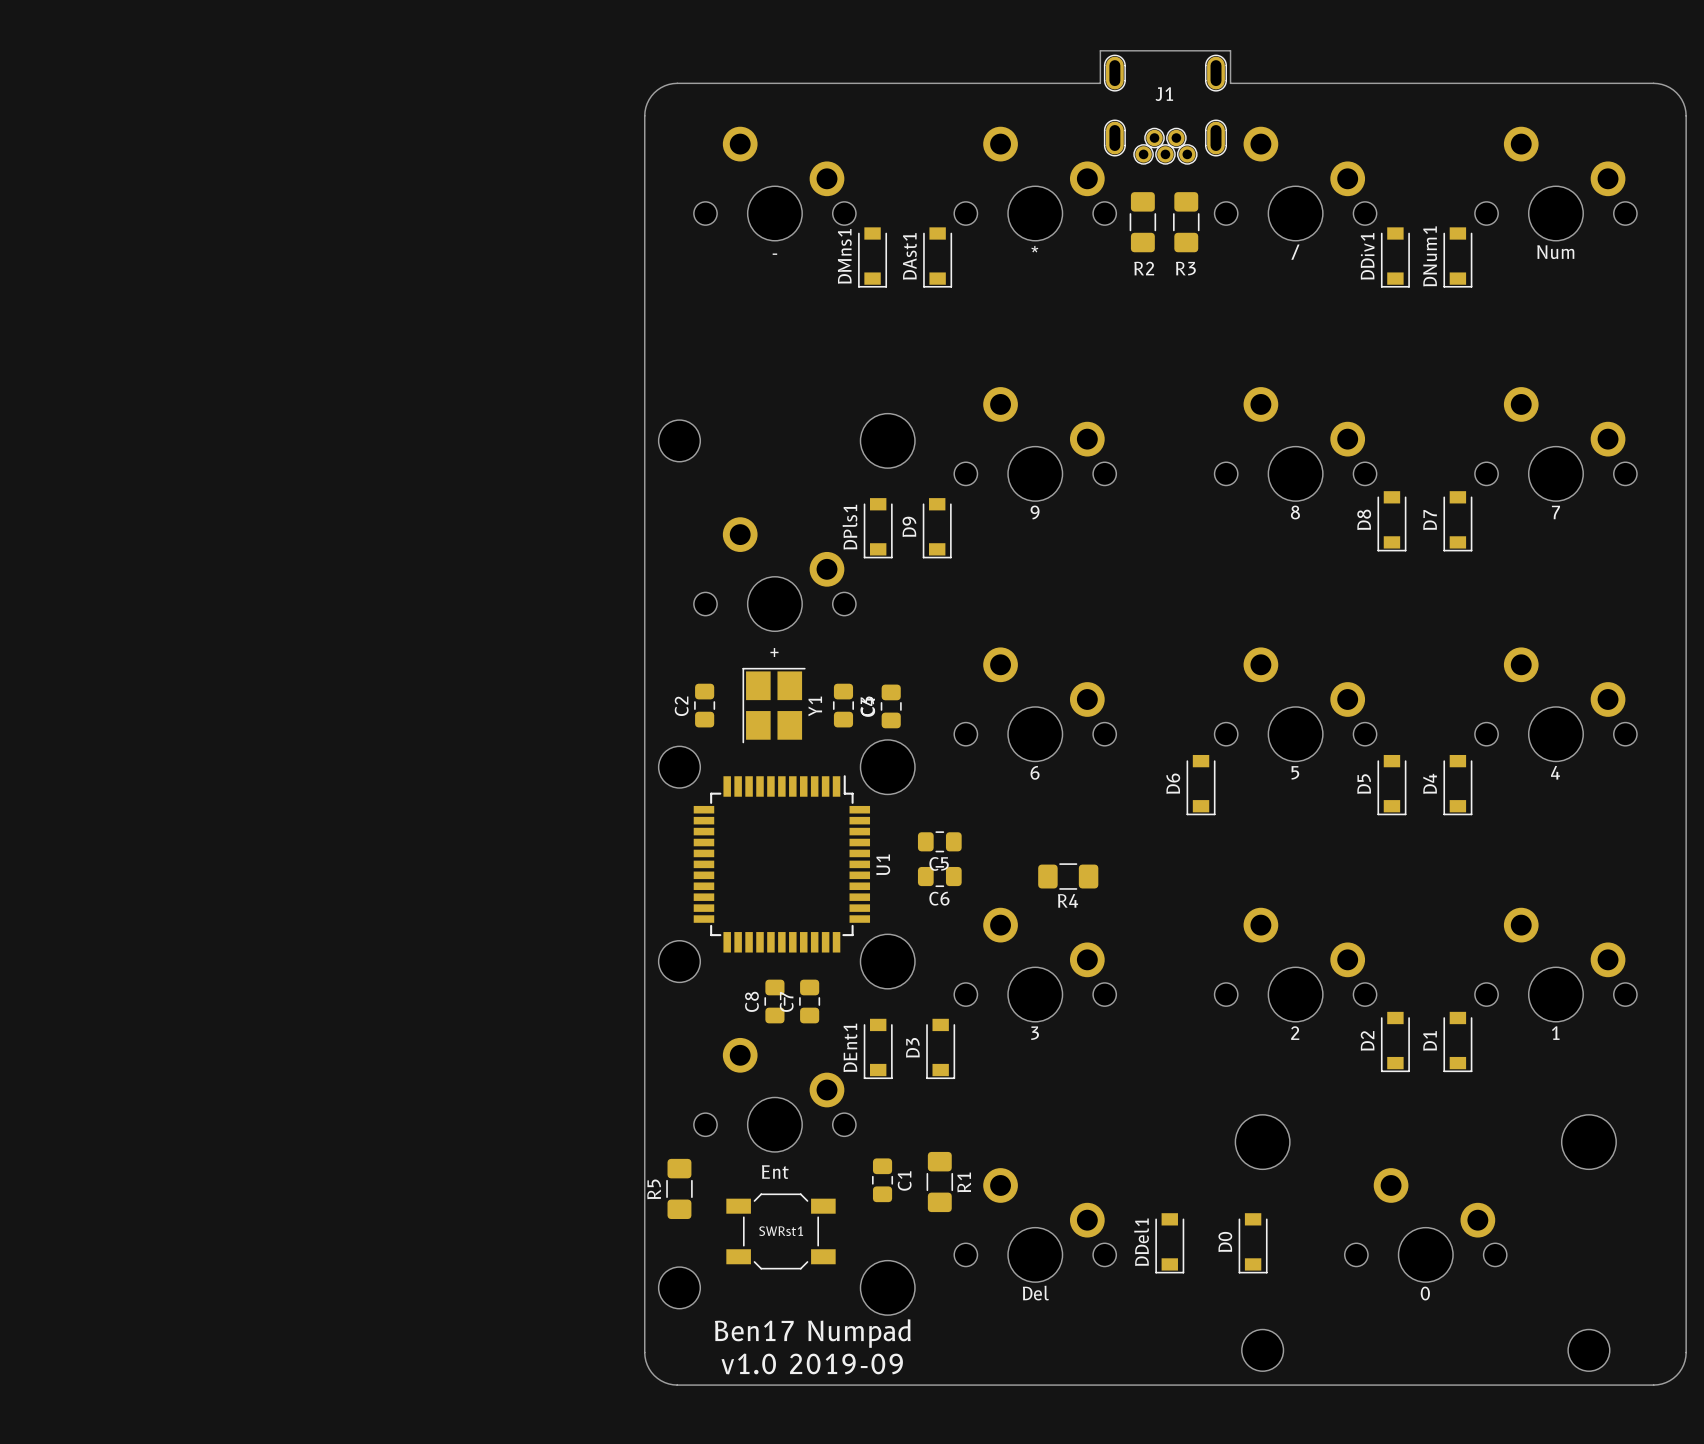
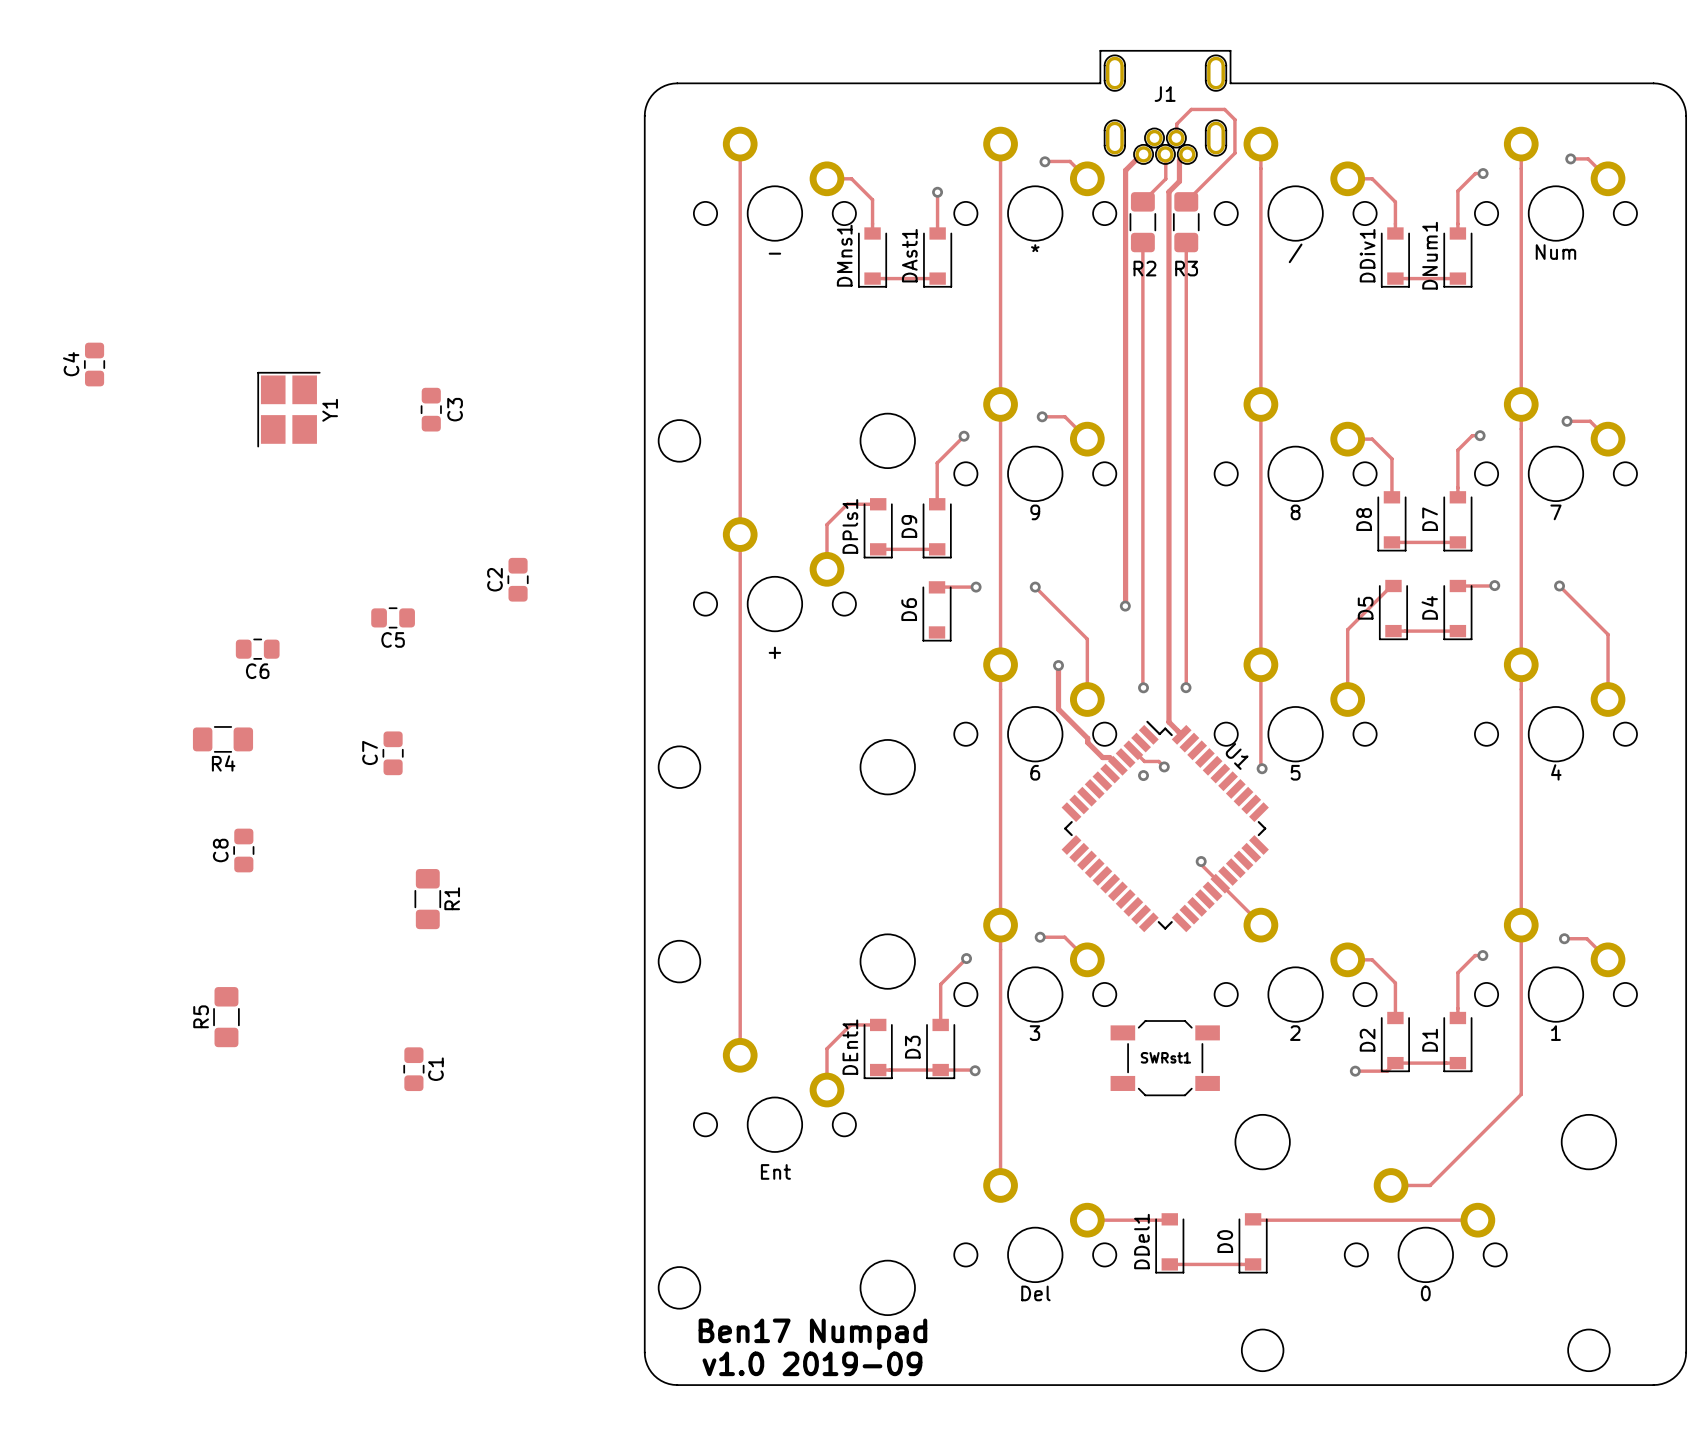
track: none -> (1176, 135) (1176, 124) (1191, 109) (1224, 109) (1234, 119) (1234, 153) (1186, 201)
track: none -> (740, 144) (740, 1055)
track: none -> (1000, 144) (1000, 1185)
track: none -> (1260, 144) (1262, 768)
track: none -> (1521, 144) (1521, 1094) (1430, 1185) (1391, 1185)
track: none -> (1143, 152) (1125, 170) (1125, 606)
track: none -> (1165, 152) (1165, 178) (1142, 201)
track: none -> (1187, 152) (1179, 160) (1179, 181) (1168, 191) (1168, 722) (1181, 734)
track: none -> (1570, 158) (1588, 158) (1608, 178)
via: none -> (1570, 158)
track: none -> (1044, 161) (1069, 161) (1087, 178)
via: none -> (1044, 161)
track: none -> (1483, 173) (1475, 173) (1457, 191) (1457, 233)
via: none -> (1483, 173)
track: none -> (826, 178) (851, 178) (872, 199) (872, 233)
track: none -> (1347, 178) (1372, 178) (1395, 201) (1395, 233)
track: none -> (937, 192) (937, 233)
via: none -> (937, 192)
track: none -> (1142, 242) (1143, 687)
track: none -> (1186, 242) (1186, 687)
track: none -> (872, 278) (937, 278)
track: none -> (1395, 278) (1457, 278)
track: none -> (1042, 416) (1064, 416) (1087, 439)
via: none -> (1042, 416)
track: none -> (1567, 421) (1590, 421) (1608, 439)
via: none -> (1567, 421)
track: none -> (1480, 435) (1472, 435) (1457, 450) (1457, 497)
via: none -> (1480, 435)
track: none -> (964, 436) (937, 463) (937, 504)
via: none -> (964, 436)
track: none -> (1347, 439) (1372, 439) (1391, 458) (1391, 497)
track: none -> (878, 504) (847, 504) (826, 524) (826, 569)
track: none -> (1391, 542) (1457, 542)
track: none -> (878, 549) (937, 549)
track: none -> (1494, 585) (1457, 586)
via: none -> (1494, 585)
track: none -> (1393, 586) (1347, 629) (1347, 699)
track: none -> (1559, 586) (1608, 634) (1608, 699)
via: none -> (1559, 586)
track: none -> (976, 587) (937, 587)
via: none -> (976, 587)
track: none -> (1035, 587) (1087, 639) (1087, 699)
via: none -> (1035, 587)
via: none -> (1125, 606)
track: none -> (1393, 631) (1457, 631)
track: none -> (1058, 665) (1058, 709) (1087, 738) (1087, 742) (1102, 757) (1109, 757) (1117, 765)
via: none -> (1058, 665)
via: none -> (1143, 687)
via: none -> (1186, 687)
C2 position: (704, 705) -> (518, 579)
Y1 position: (774, 705) -> (288, 409)
C3 position: (843, 705) -> (431, 409)
C4 position: (891, 706) -> (94, 364)
track: none -> (1133, 750) (1144, 761) (1158, 761) (1164, 766)
via: none -> (1164, 766)
via: none -> (1262, 768)
via: none -> (1143, 775)
D6 position: (1201, 785) -> (937, 611)
D5 position: (1391, 785) -> (1393, 609)
D4 position: (1457, 785) -> (1457, 609)
C5 position: (939, 841) -> (393, 617)
track: none -> (1201, 861) (1201, 864) (1260, 925)
via: none -> (1201, 861)
U1 rotation: 0° (781, 863) -> 45° counterclockwise (1165, 826)
U1 position: (781, 863) -> (1165, 826)
C6 position: (939, 876) -> (257, 649)
R4 position: (1068, 876) -> (222, 739)
track: none -> (1040, 937) (1064, 937) (1087, 959)
via: none -> (1040, 937)
track: none -> (1564, 938) (1586, 938) (1608, 959)
via: none -> (1564, 938)
track: none -> (1482, 955) (1475, 955) (1457, 972) (1457, 1018)
via: none -> (1482, 955)
track: none -> (966, 958) (940, 984) (940, 1024)
via: none -> (966, 958)
track: none -> (1347, 959) (1372, 959) (1395, 983) (1395, 1018)
C8 position: (774, 1001) -> (243, 850)
C7 position: (809, 1001) -> (393, 753)
track: none -> (878, 1024) (850, 1024) (826, 1048) (826, 1090)
track: none -> (1457, 1063) (1395, 1063) (1387, 1071) (1355, 1071)
track: none -> (878, 1070) (975, 1070)
via: none -> (975, 1070)
via: none -> (1355, 1071)
C1 position: (882, 1180) -> (413, 1069)
R1 position: (939, 1182) -> (427, 899)
R5 position: (679, 1188) -> (226, 1017)
track: none -> (1169, 1219) (1087, 1220)
track: none -> (1253, 1219) (1477, 1220)
SWRst1 position: (781, 1231) -> (1165, 1058)
track: none -> (1169, 1264) (1253, 1264)

